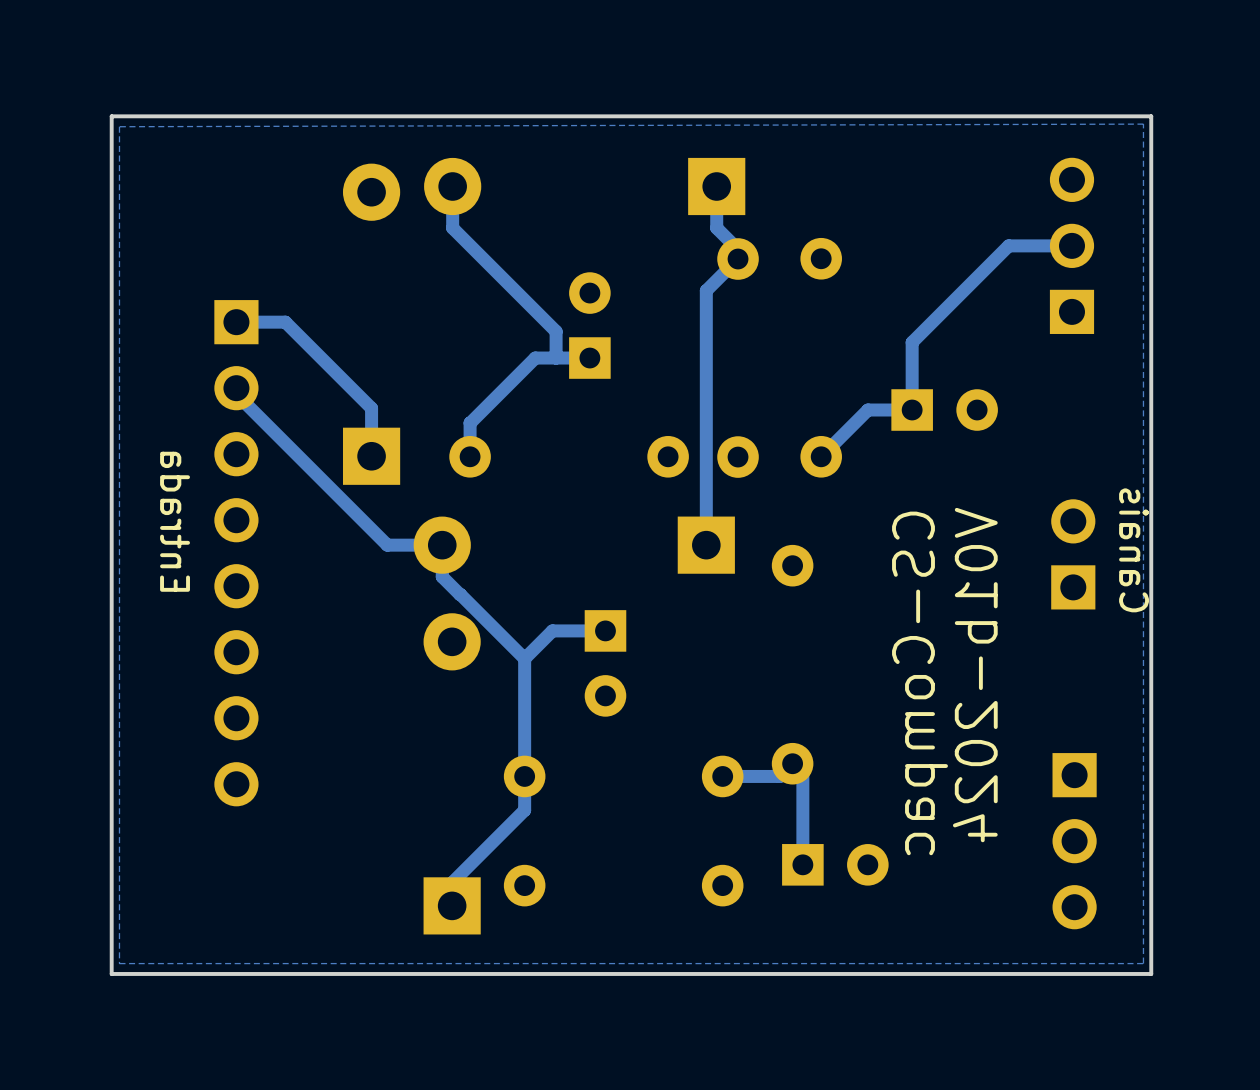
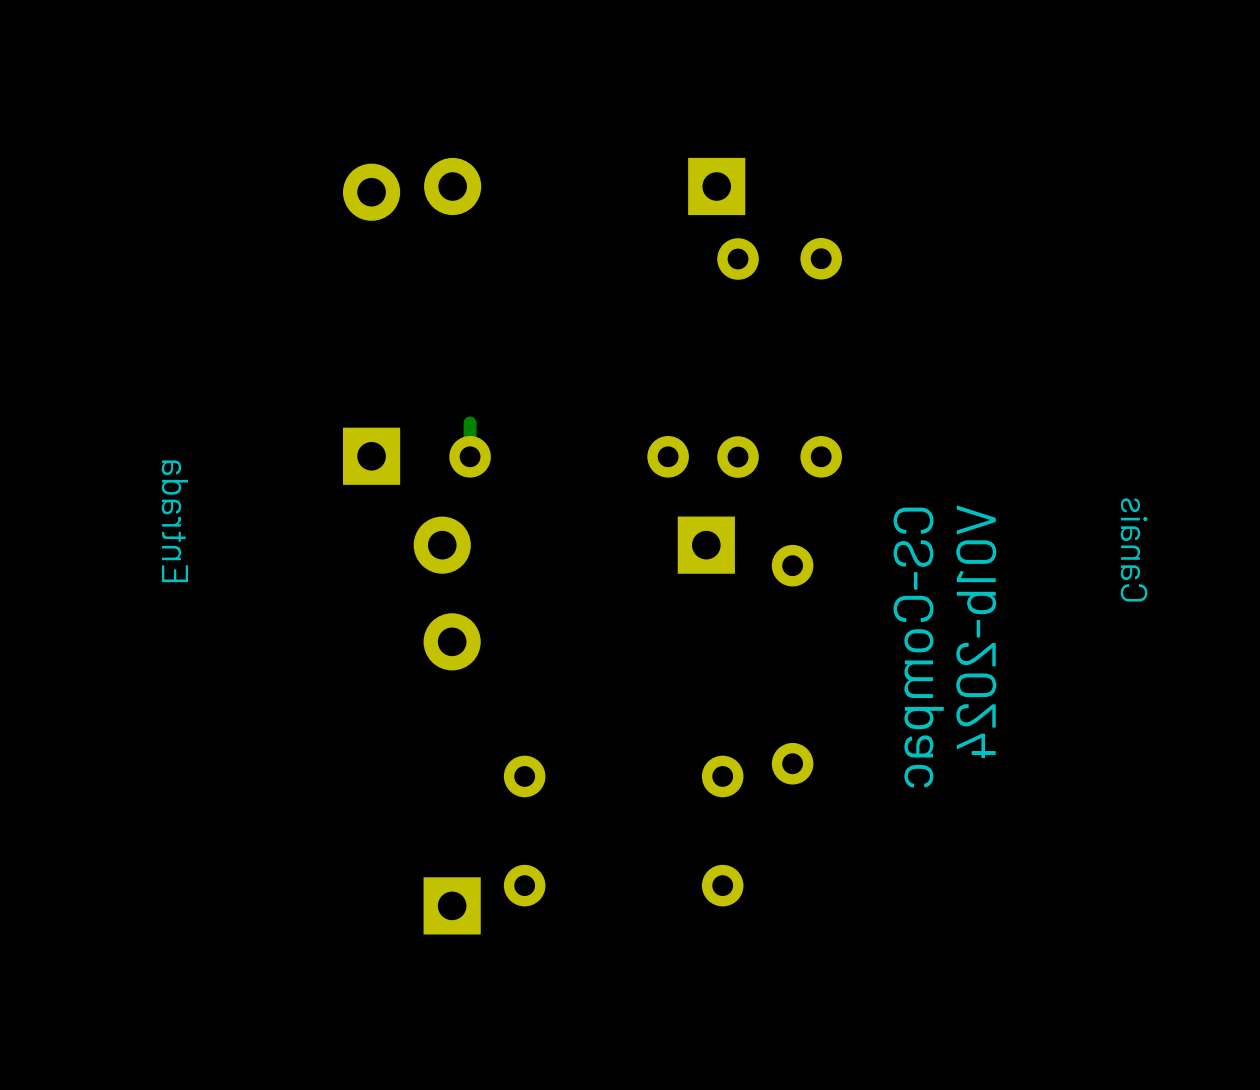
board edge: (1151, 116) (111, 116) (111, 973) (1151, 973) (1151, 116) -> none
zone outline: (1143, 124) (119, 126) (119, 963) (1143, 963) (1143, 124) -> none
track: (452, 186) (452, 228) (556, 331) (556, 358) -> none
track: (716, 186) (716, 228) (738, 249) (738, 259) (706, 290) (706, 545) -> none
track: (1071, 245) (1008, 245) (912, 342) (912, 410) (867, 410) (821, 456) -> none
part: (1071, 245) -> none
track: (236, 322) (285, 322) (371, 408) (371, 456) -> none
part: (589, 325) -> none
track: (589, 358) (535, 358) (470, 423) -> none
track: (236, 388) (236, 394) (387, 545) (442, 545) (442, 576) (459, 594) -> none
part: (944, 410) -> none
part: (236, 553) -> none
part: (1073, 554) -> none
track: (460, 594) (524, 658) -> none
track: (605, 630) (552, 630) (524, 658) -> none
track: (524, 658) (524, 810) (452, 882) (452, 905) -> none
part: (605, 663) -> none
track: (722, 776) (779, 776) (792, 763) (802, 773) (802, 864) -> none
part: (1074, 841) -> none
part: (835, 864) -> none

